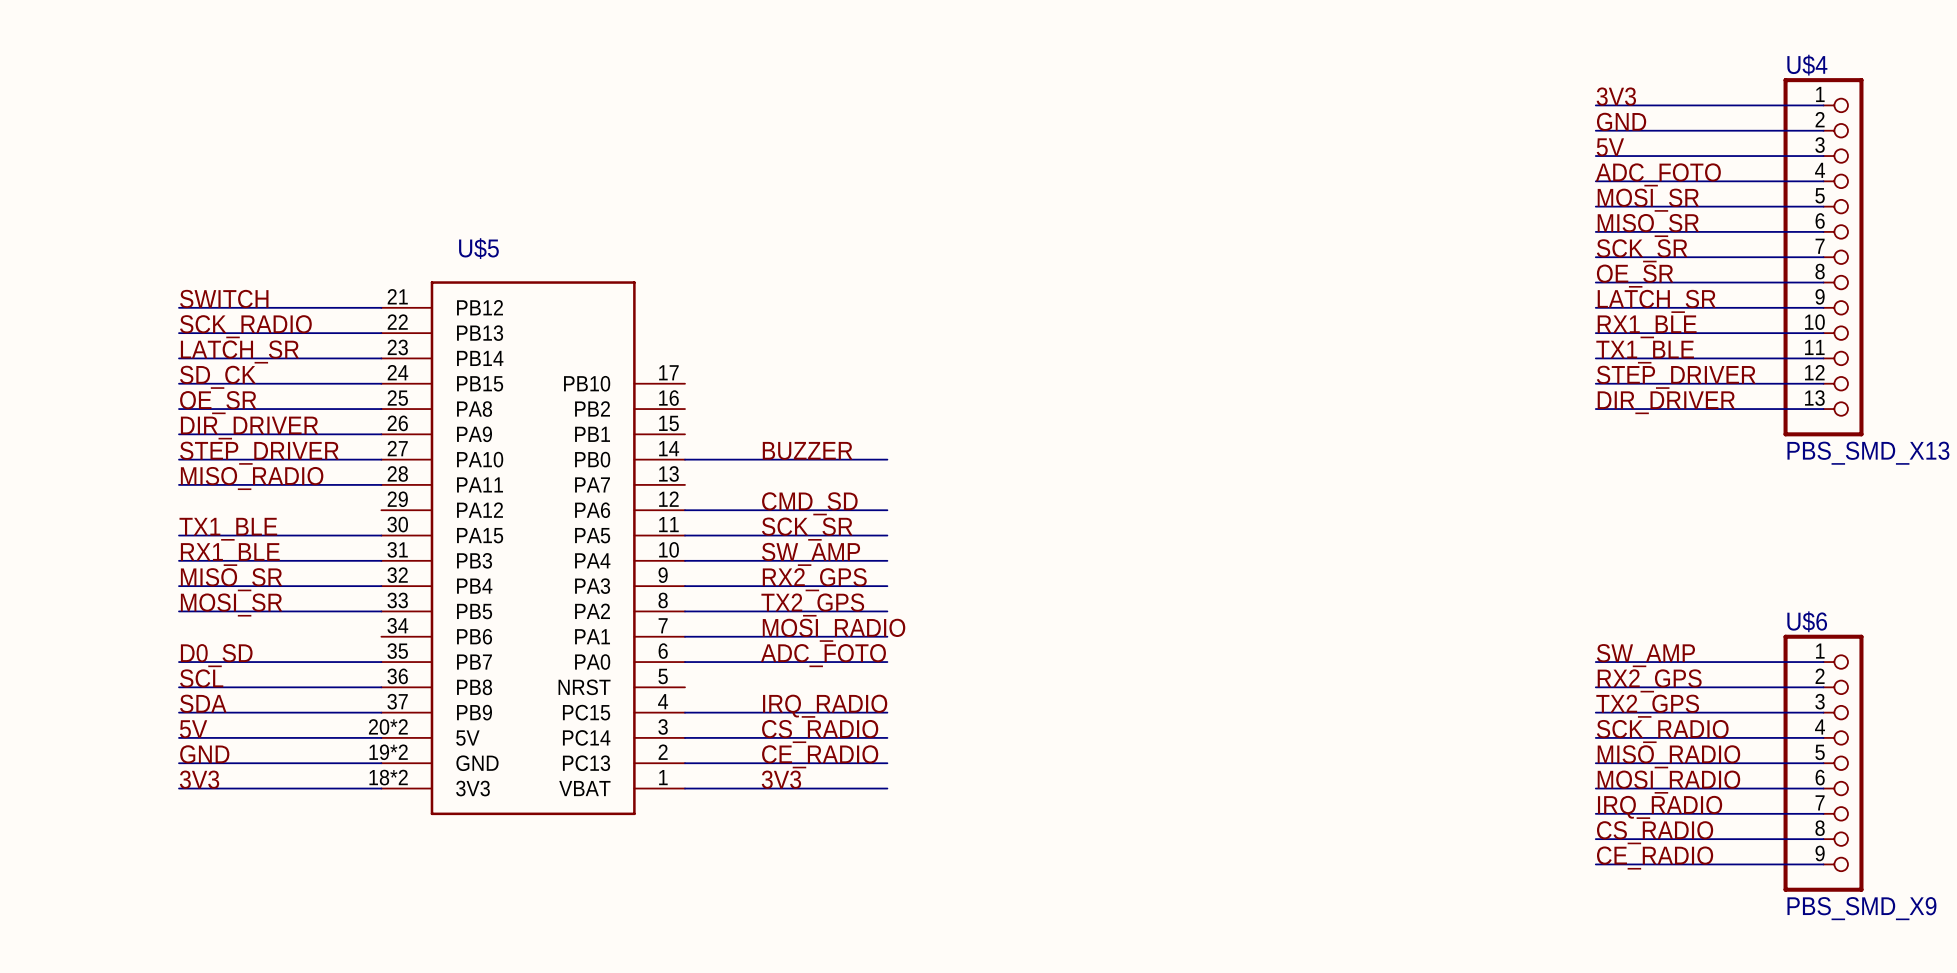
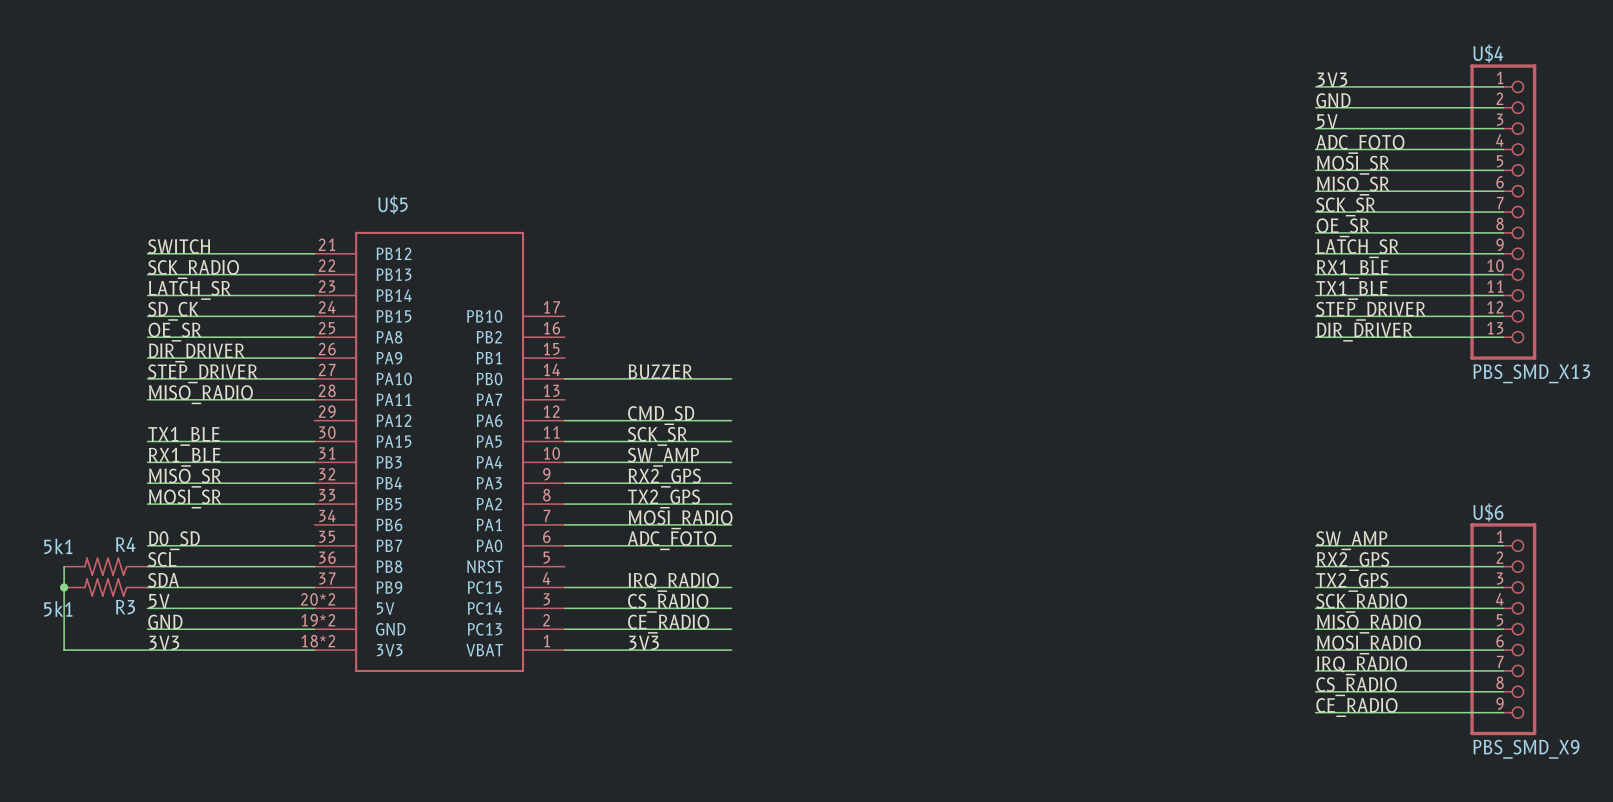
wire: none -> (64, 566) (64, 650) (147, 650)
R4: none -> 5k1 (105, 566)
junction: none -> (64, 587)
R3: none -> 5k1 (105, 587)

